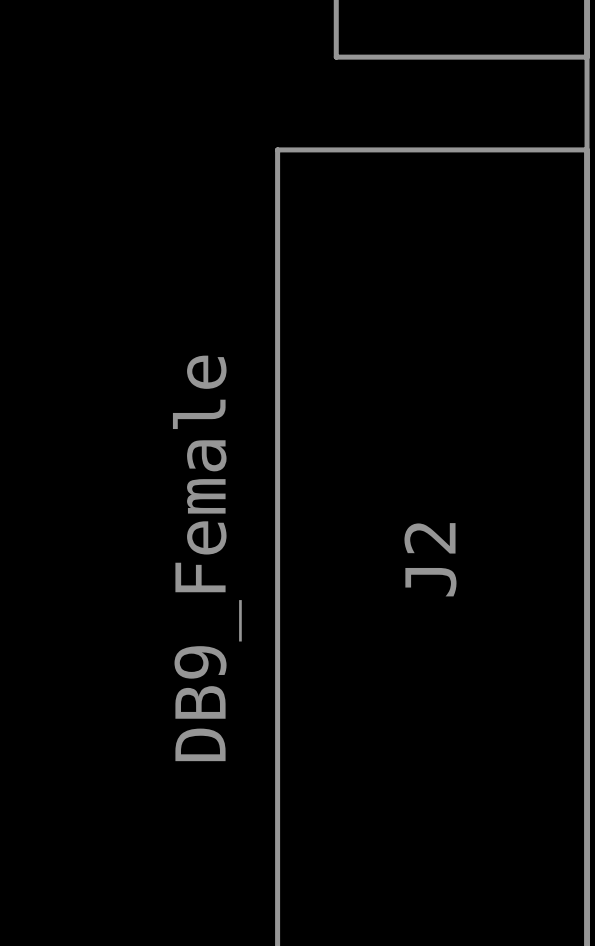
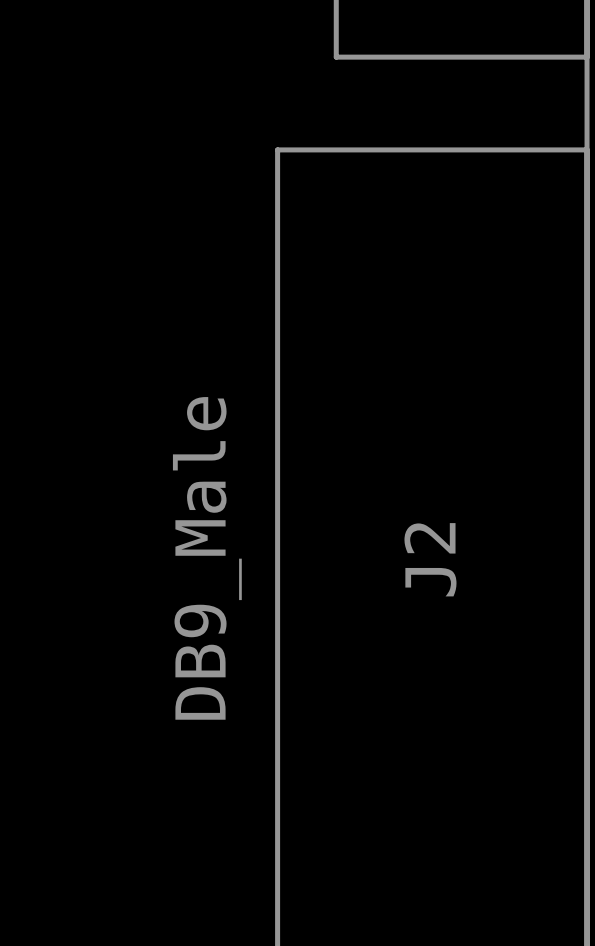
J2 value: DB9_Female (207, 558) -> DB9_Male (207, 558)

